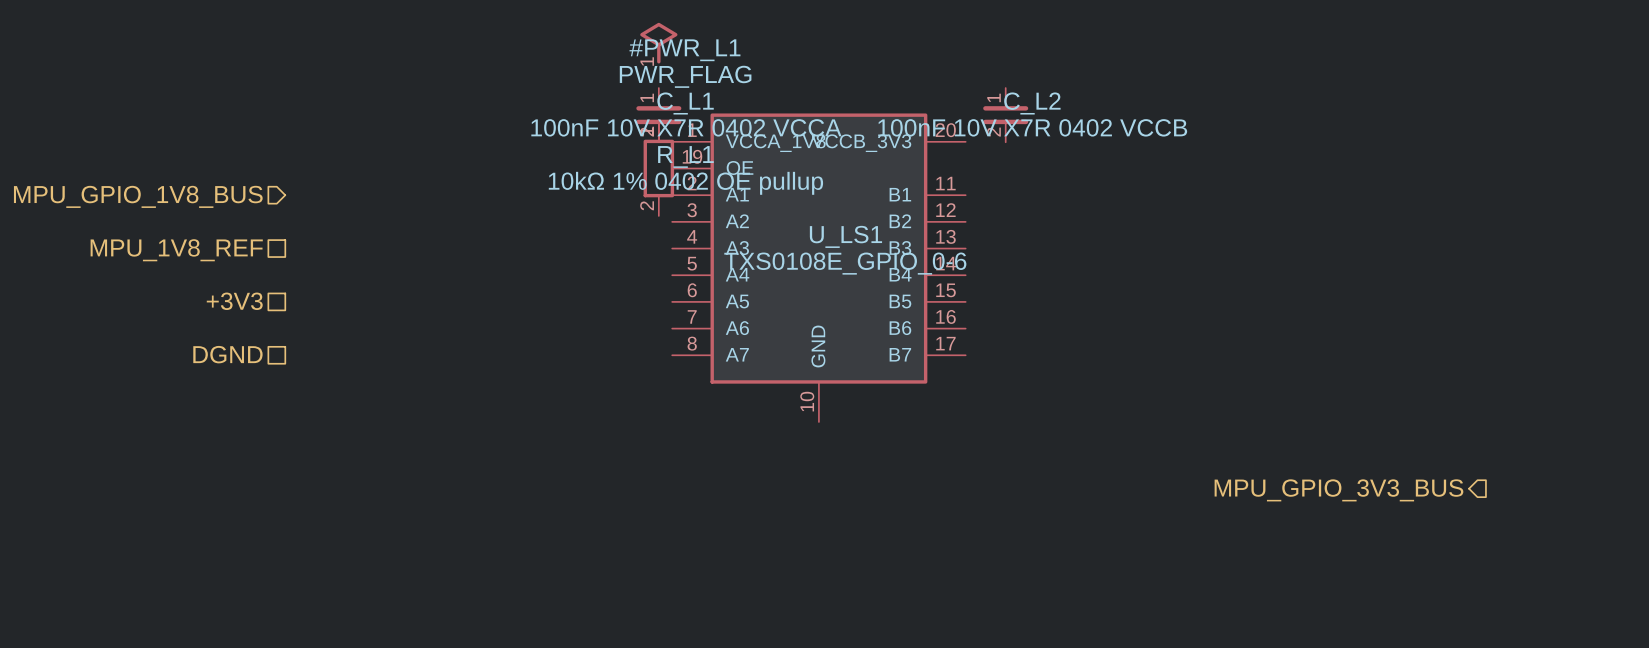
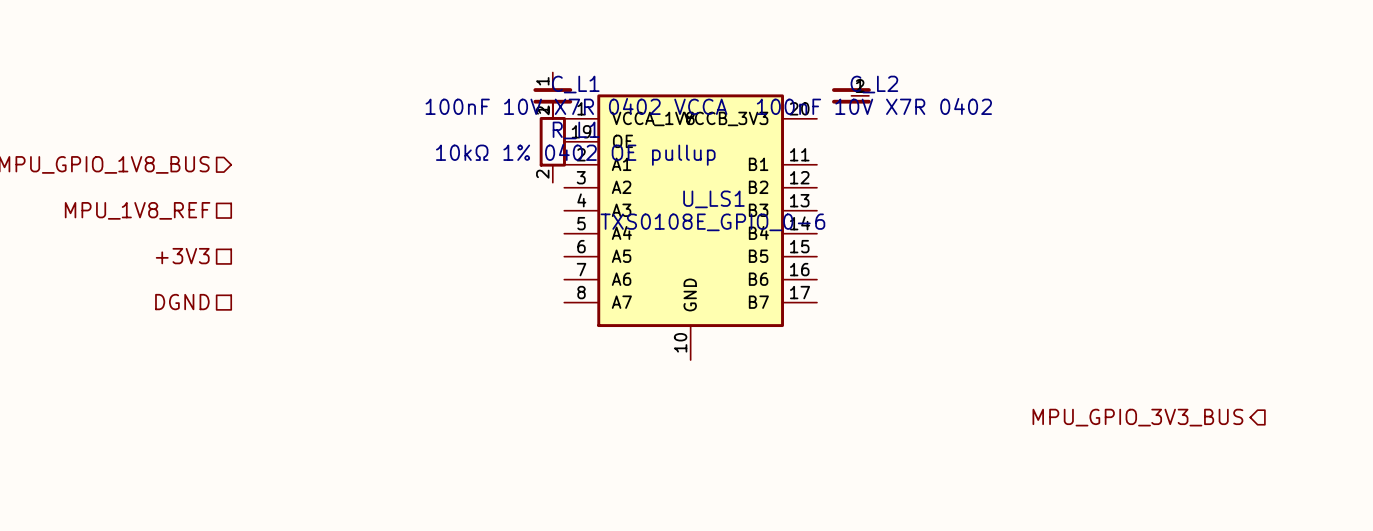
#PWR_L1: PWR_FLAG (658, 43) -> none
C_L2 symbol: [983, 88, 1029, 143] -> [832, 88, 871, 104]
C_L2 value: 100nF 10V X7R 0402 VCCB (1032, 127) -> 100nF 10V X7R 0402 (874, 106)

